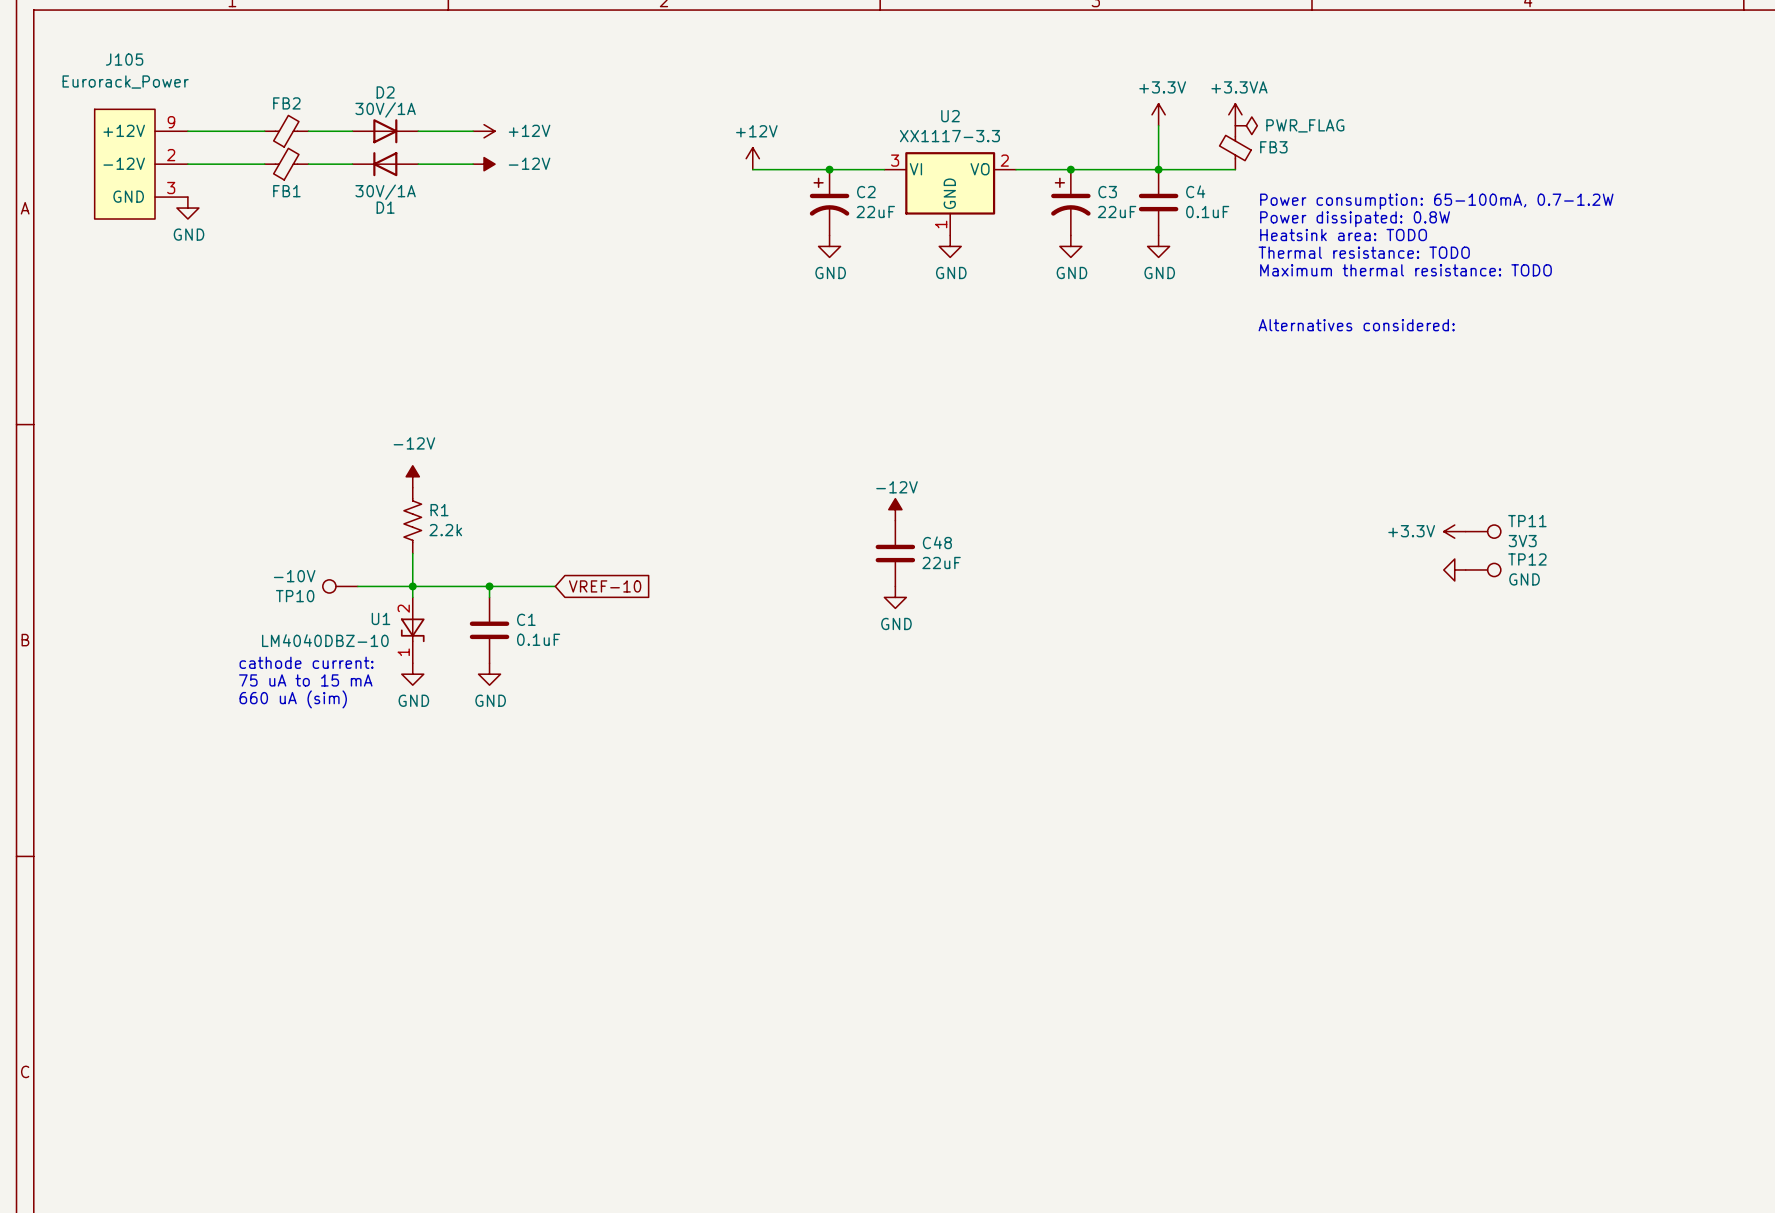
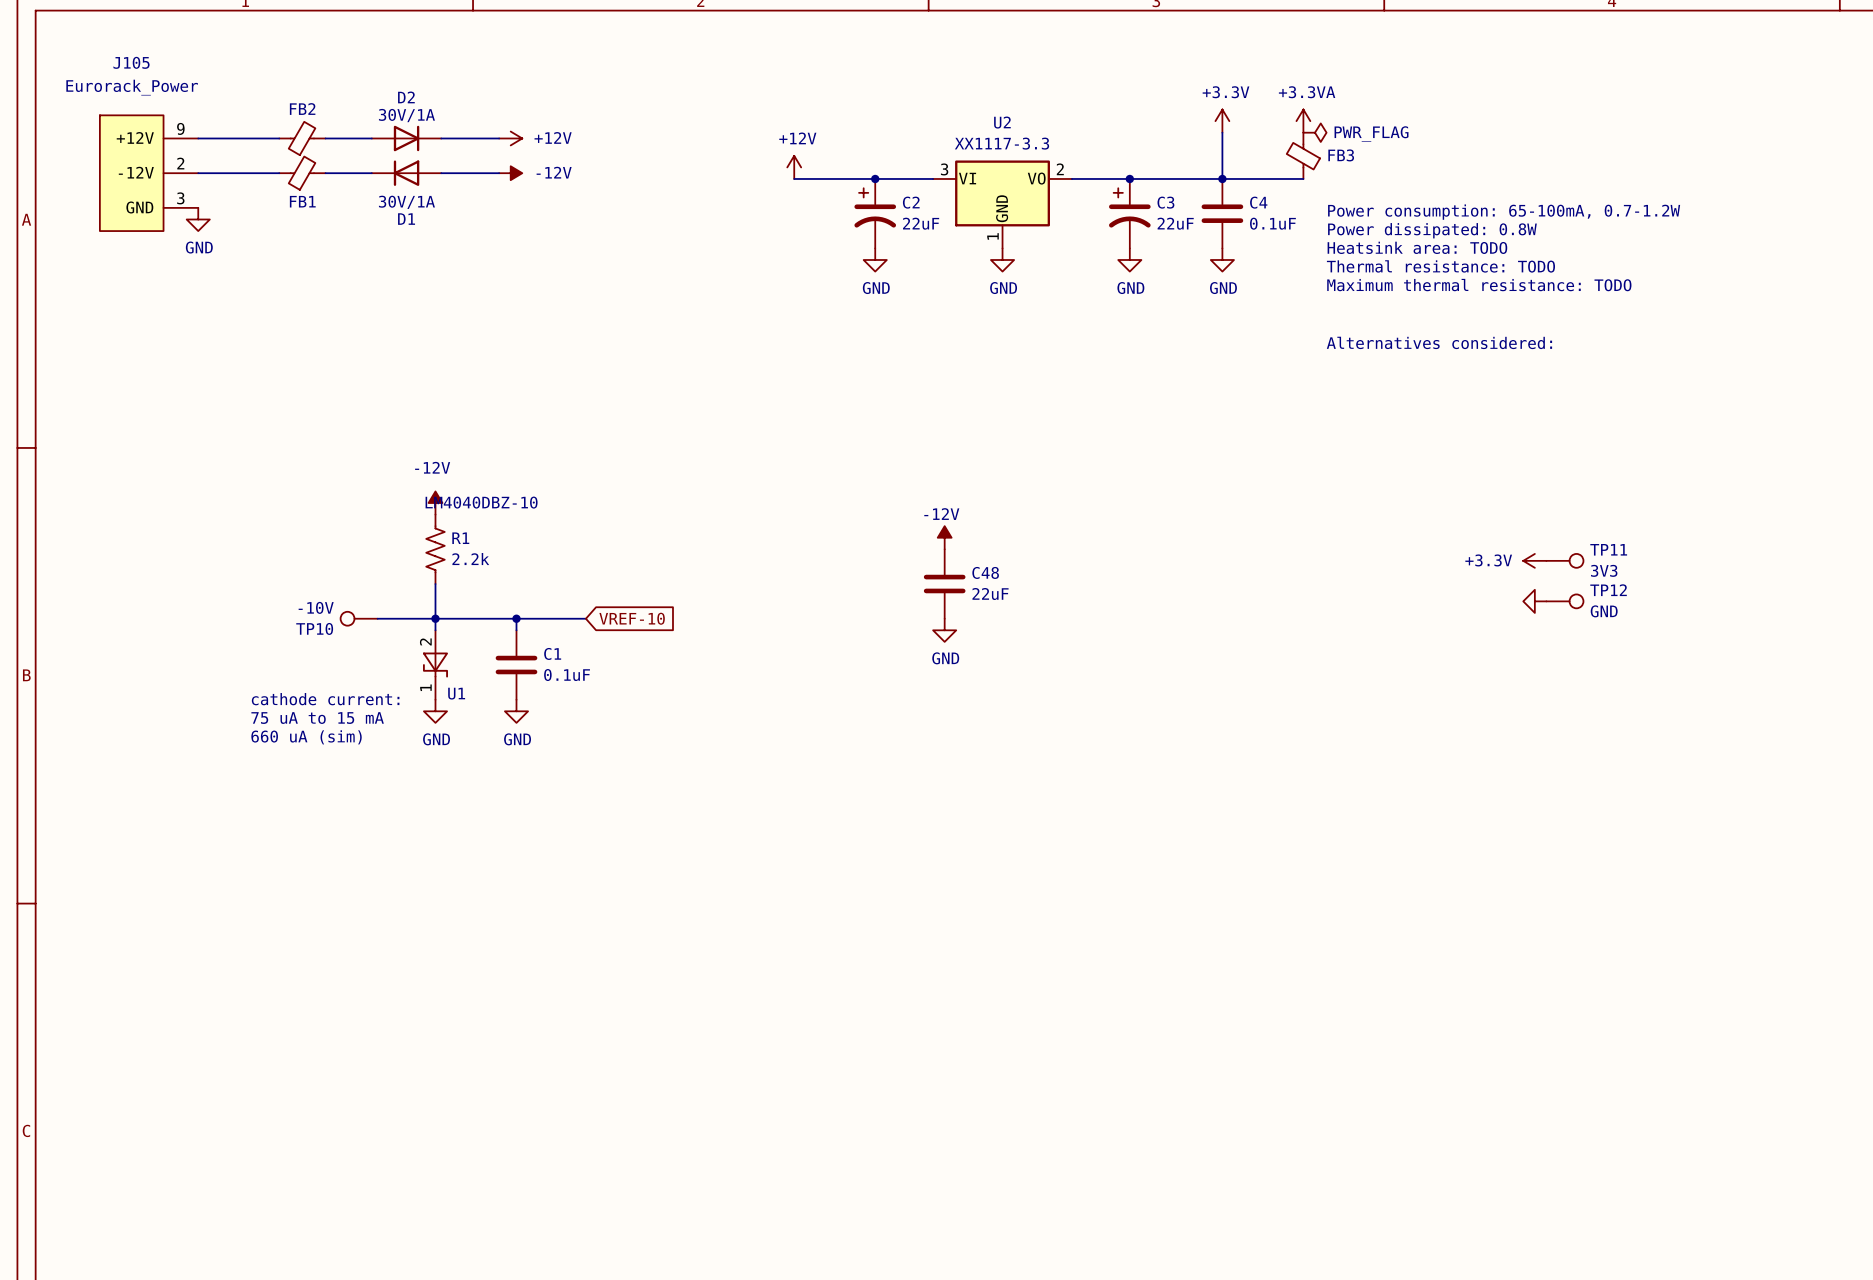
U1 name position: U1 (380, 618) -> U1 (456, 693)
U1 value position: LM4040DBZ-10 (325, 640) -> LM4040DBZ-10 (481, 502)

